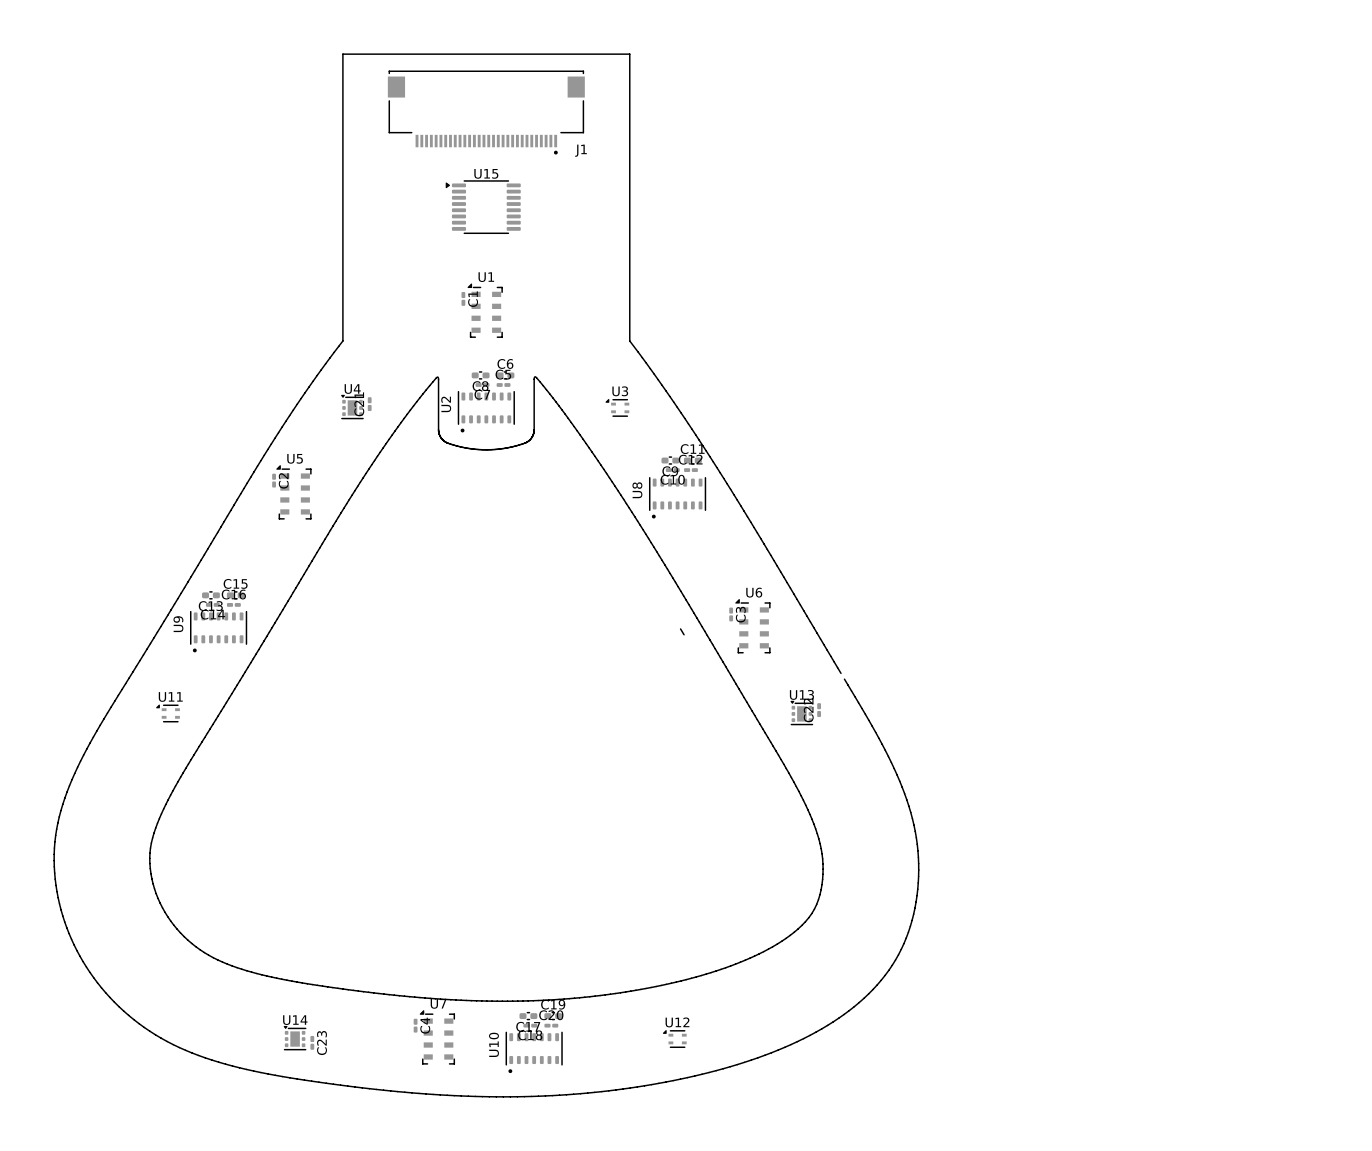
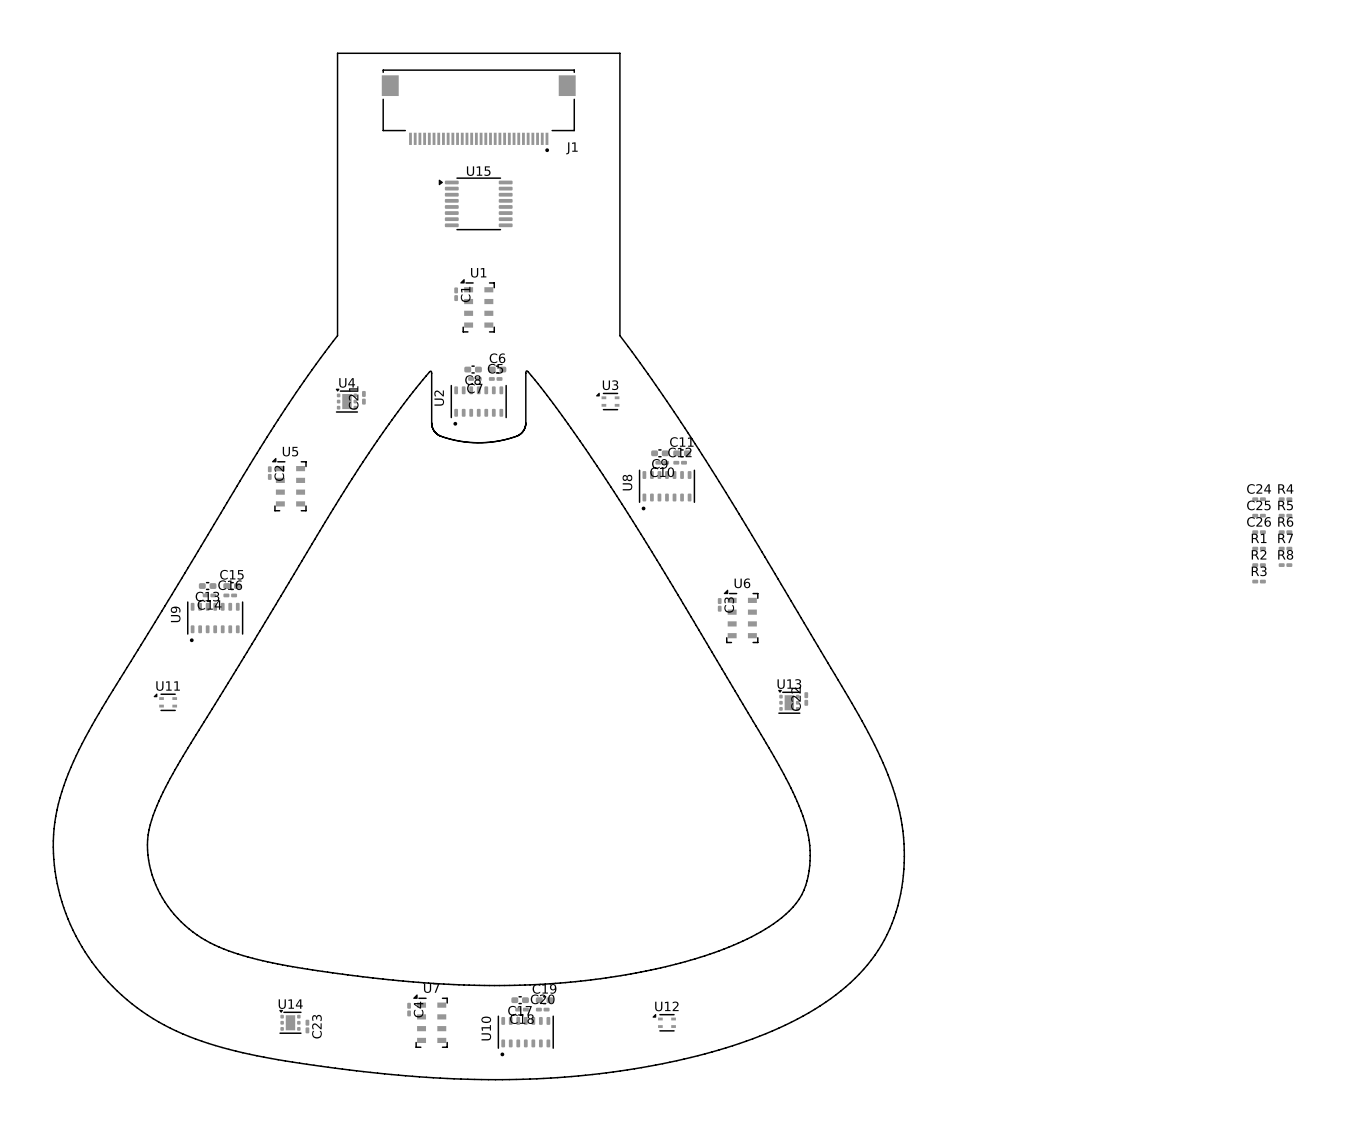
C24: none -> (1259, 499)
R4: none -> (1285, 499)
C25: none -> (1259, 515)
R5: none -> (1285, 515)
C26: none -> (1259, 532)
R6: none -> (1285, 532)
R1: none -> (1259, 548)
R7: none -> (1285, 548)
R2: none -> (1259, 565)
R8: none -> (1285, 565)
R3: none -> (1259, 581)
board edge: (680, 628) (684, 634) -> (827, 662) (831, 668)

